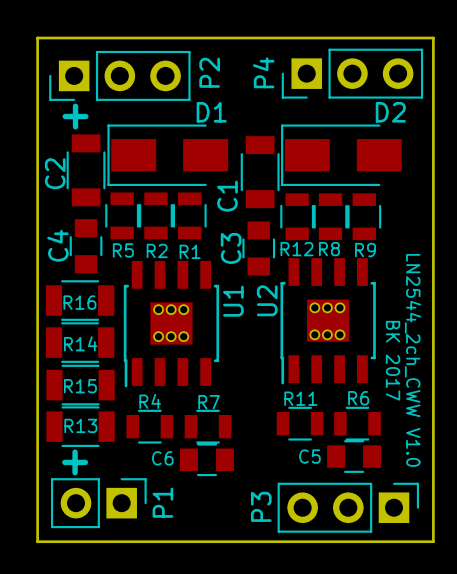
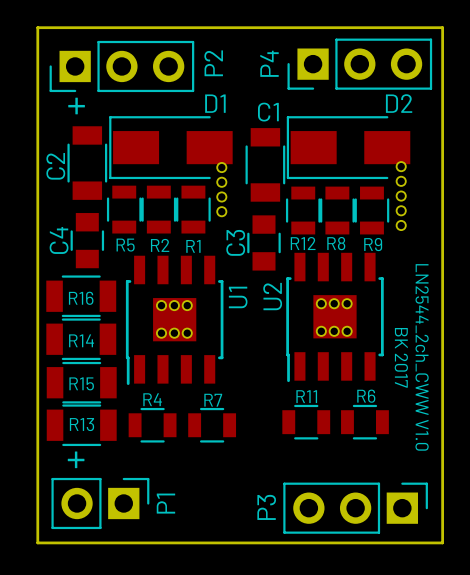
part: none -> (401, 166)
part: none -> (221, 167)
part: none -> (401, 181)
part: none -> (221, 182)
C1 name rotation: 0° (227, 196) -> 90° clockwise (268, 112)
C1 name position: C1 (227, 196) -> C1 (268, 112)
part: none -> (401, 196)
part: none -> (221, 196)
part: none -> (221, 211)
part: none -> (401, 210)
part: none -> (401, 225)
C5: (354, 456) -> none
C6: (206, 459) -> none

